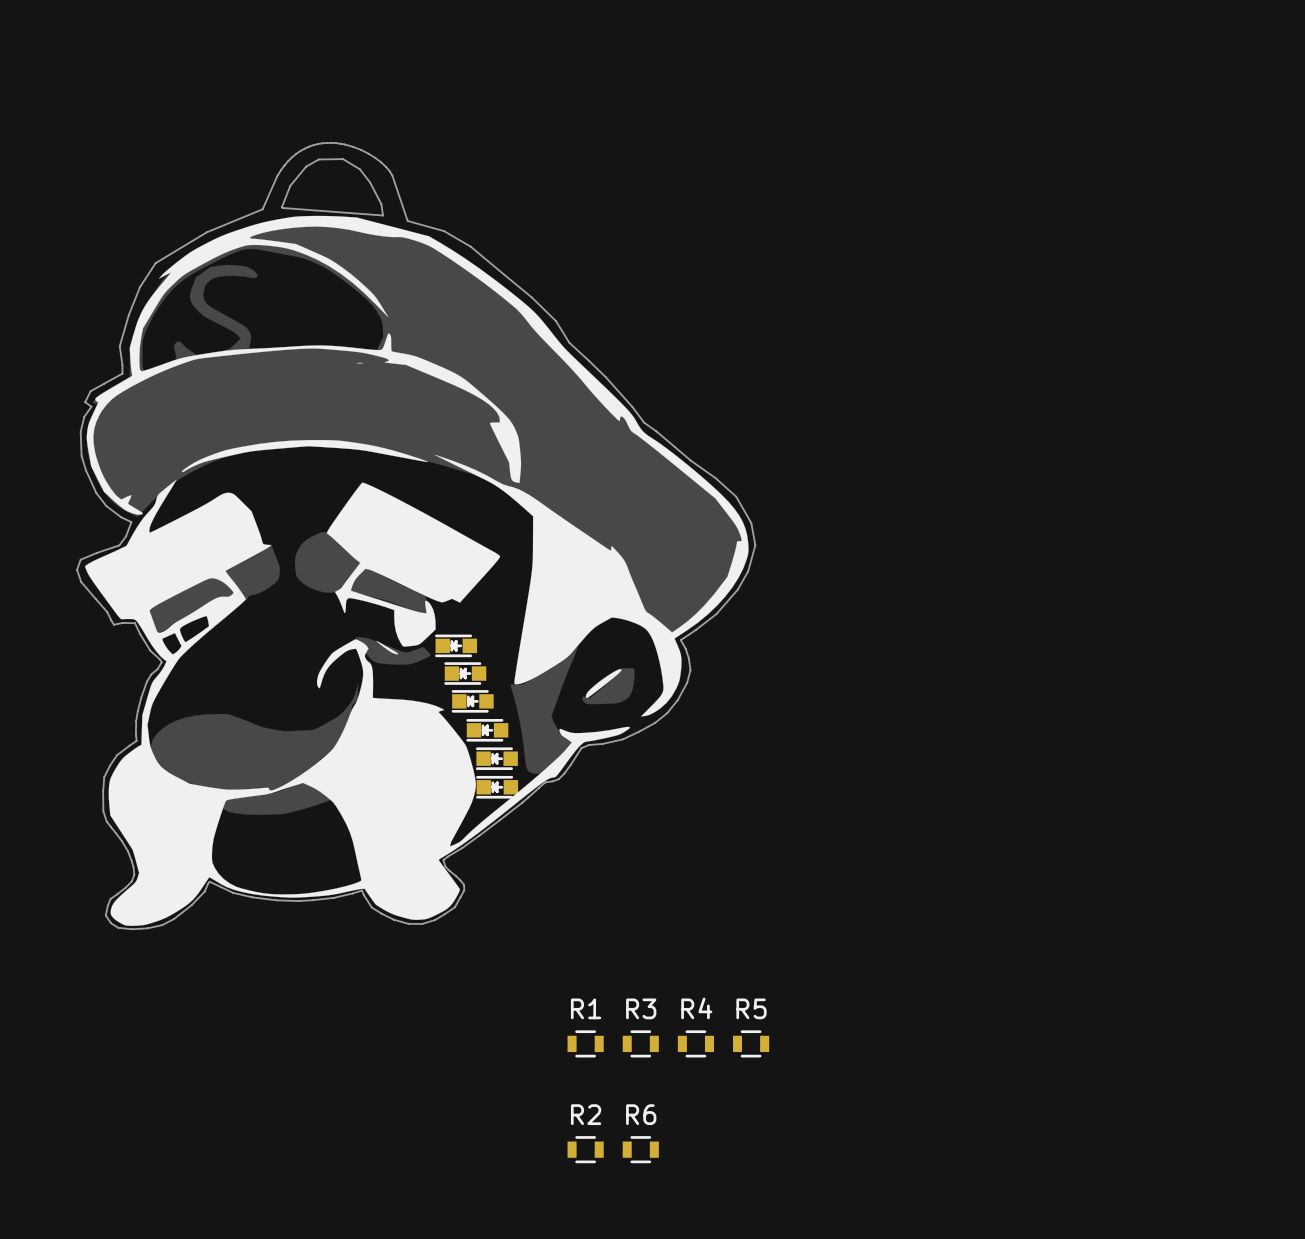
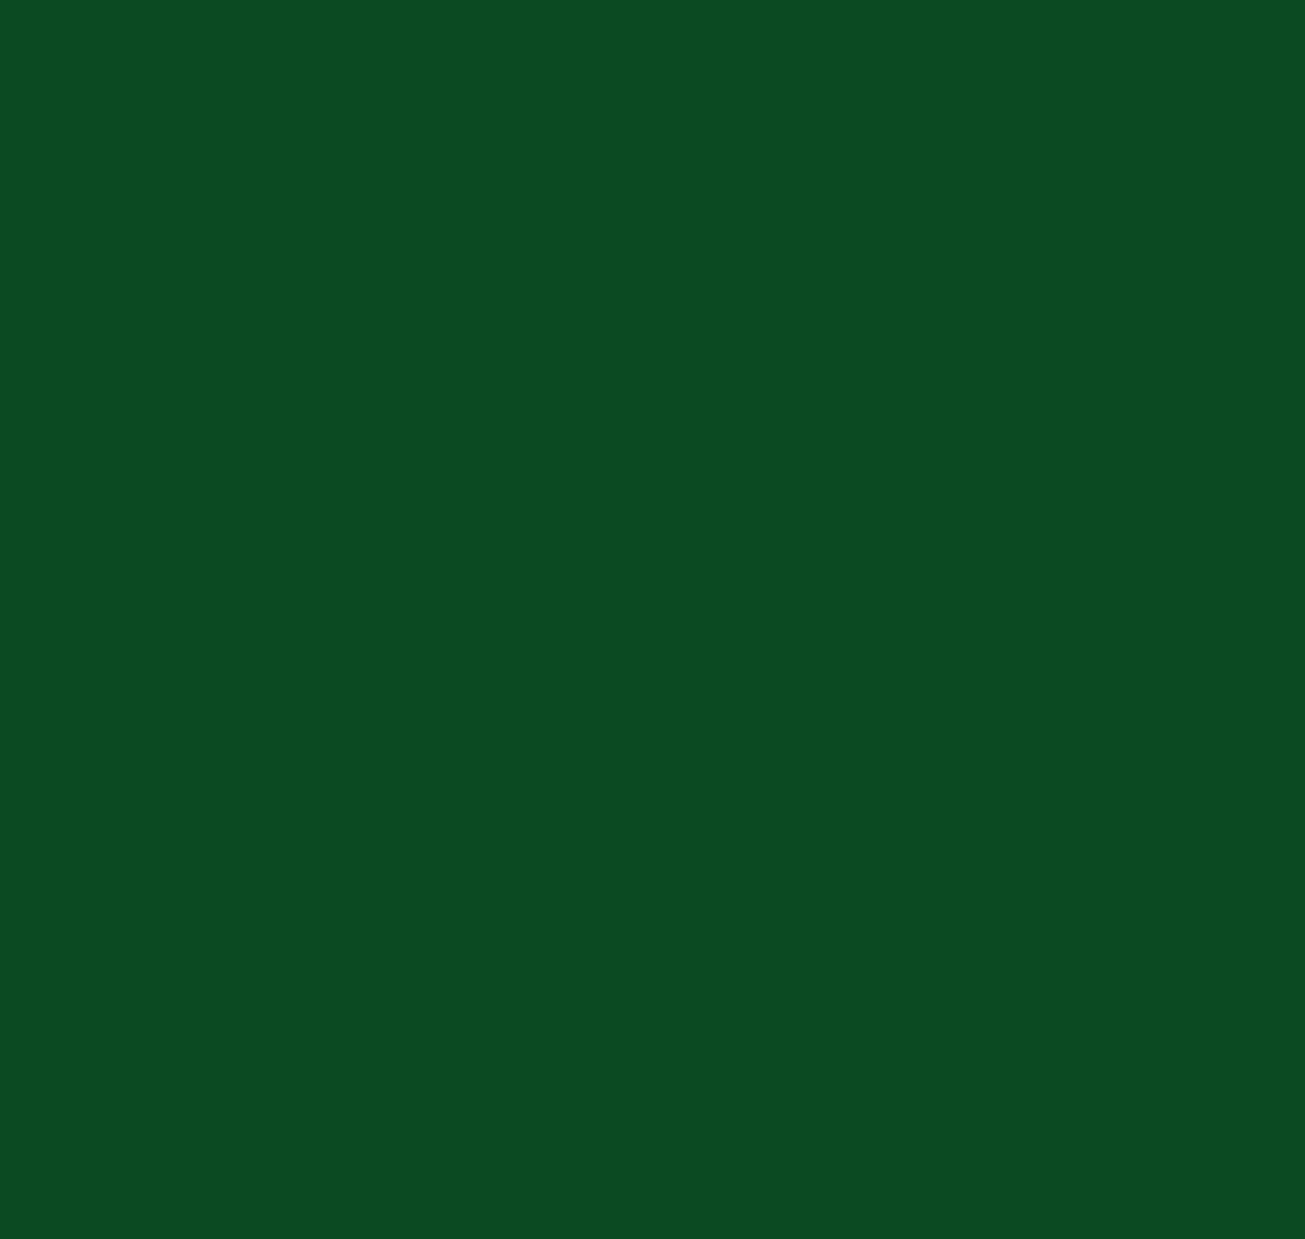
board edge: (326, 142) (353, 146) (375, 157) (386, 166) (392, 175) (407, 220) (444, 231) (470, 246) (531, 297) (555, 320) (569, 342) (606, 377) (644, 422) (715, 478) (736, 496) (751, 523) (755, 545) (748, 571) (737, 589) (716, 614) (680, 640) (688, 658) (690, 670) (687, 683) (677, 700) (667, 713) (655, 722) (622, 739) (581, 748) (558, 779) (545, 782) (499, 820) (443, 860) (445, 866) (464, 884) (464, 890) (454, 907) (435, 920) (422, 924) (408, 923) (393, 919) (371, 907) (362, 890) (333, 897) (298, 901) (276, 900) (232, 892) (209, 881) (204, 891) (191, 905) (173, 919) (162, 925) (147, 928) (118, 927) (111, 923) (105, 915) (107, 905) (110, 899) (131, 881) (134, 874) (128, 851) (106, 821) (103, 811) (104, 777) (117, 755) (136, 740) (136, 721) (141, 697) (146, 681) (161, 662) (150, 650) (135, 623) (113, 624) (107, 611) (81, 581) (77, 569) (80, 559) (119, 545) (126, 536) (131, 522) (106, 505) (96, 493) (86, 470) (81, 455) (80, 431) (84, 416) (91, 406) (85, 402) (90, 391) (122, 373) (119, 346) (128, 315) (139, 287) (155, 263) (206, 232) (262, 209) (277, 175) (288, 161) (304, 148) (326, 142) -> none
board edge: (343, 159) (318, 159) (306, 166) (290, 185) (281, 207) (382, 215) (381, 204) (370, 182) (359, 169) (343, 159) -> none
drawing: [84, 215, 749, 926] -> none
part: (456, 645) -> none
part: (465, 673) -> none
part: (472, 701) -> none
part: (487, 730) -> none
part: (496, 758) -> none
part: (497, 787) -> none
R1: (585, 1043) -> none
R3: (640, 1043) -> none
R4: (695, 1043) -> none
R5: (751, 1043) -> none
R2: (585, 1149) -> none
R6: (640, 1149) -> none

